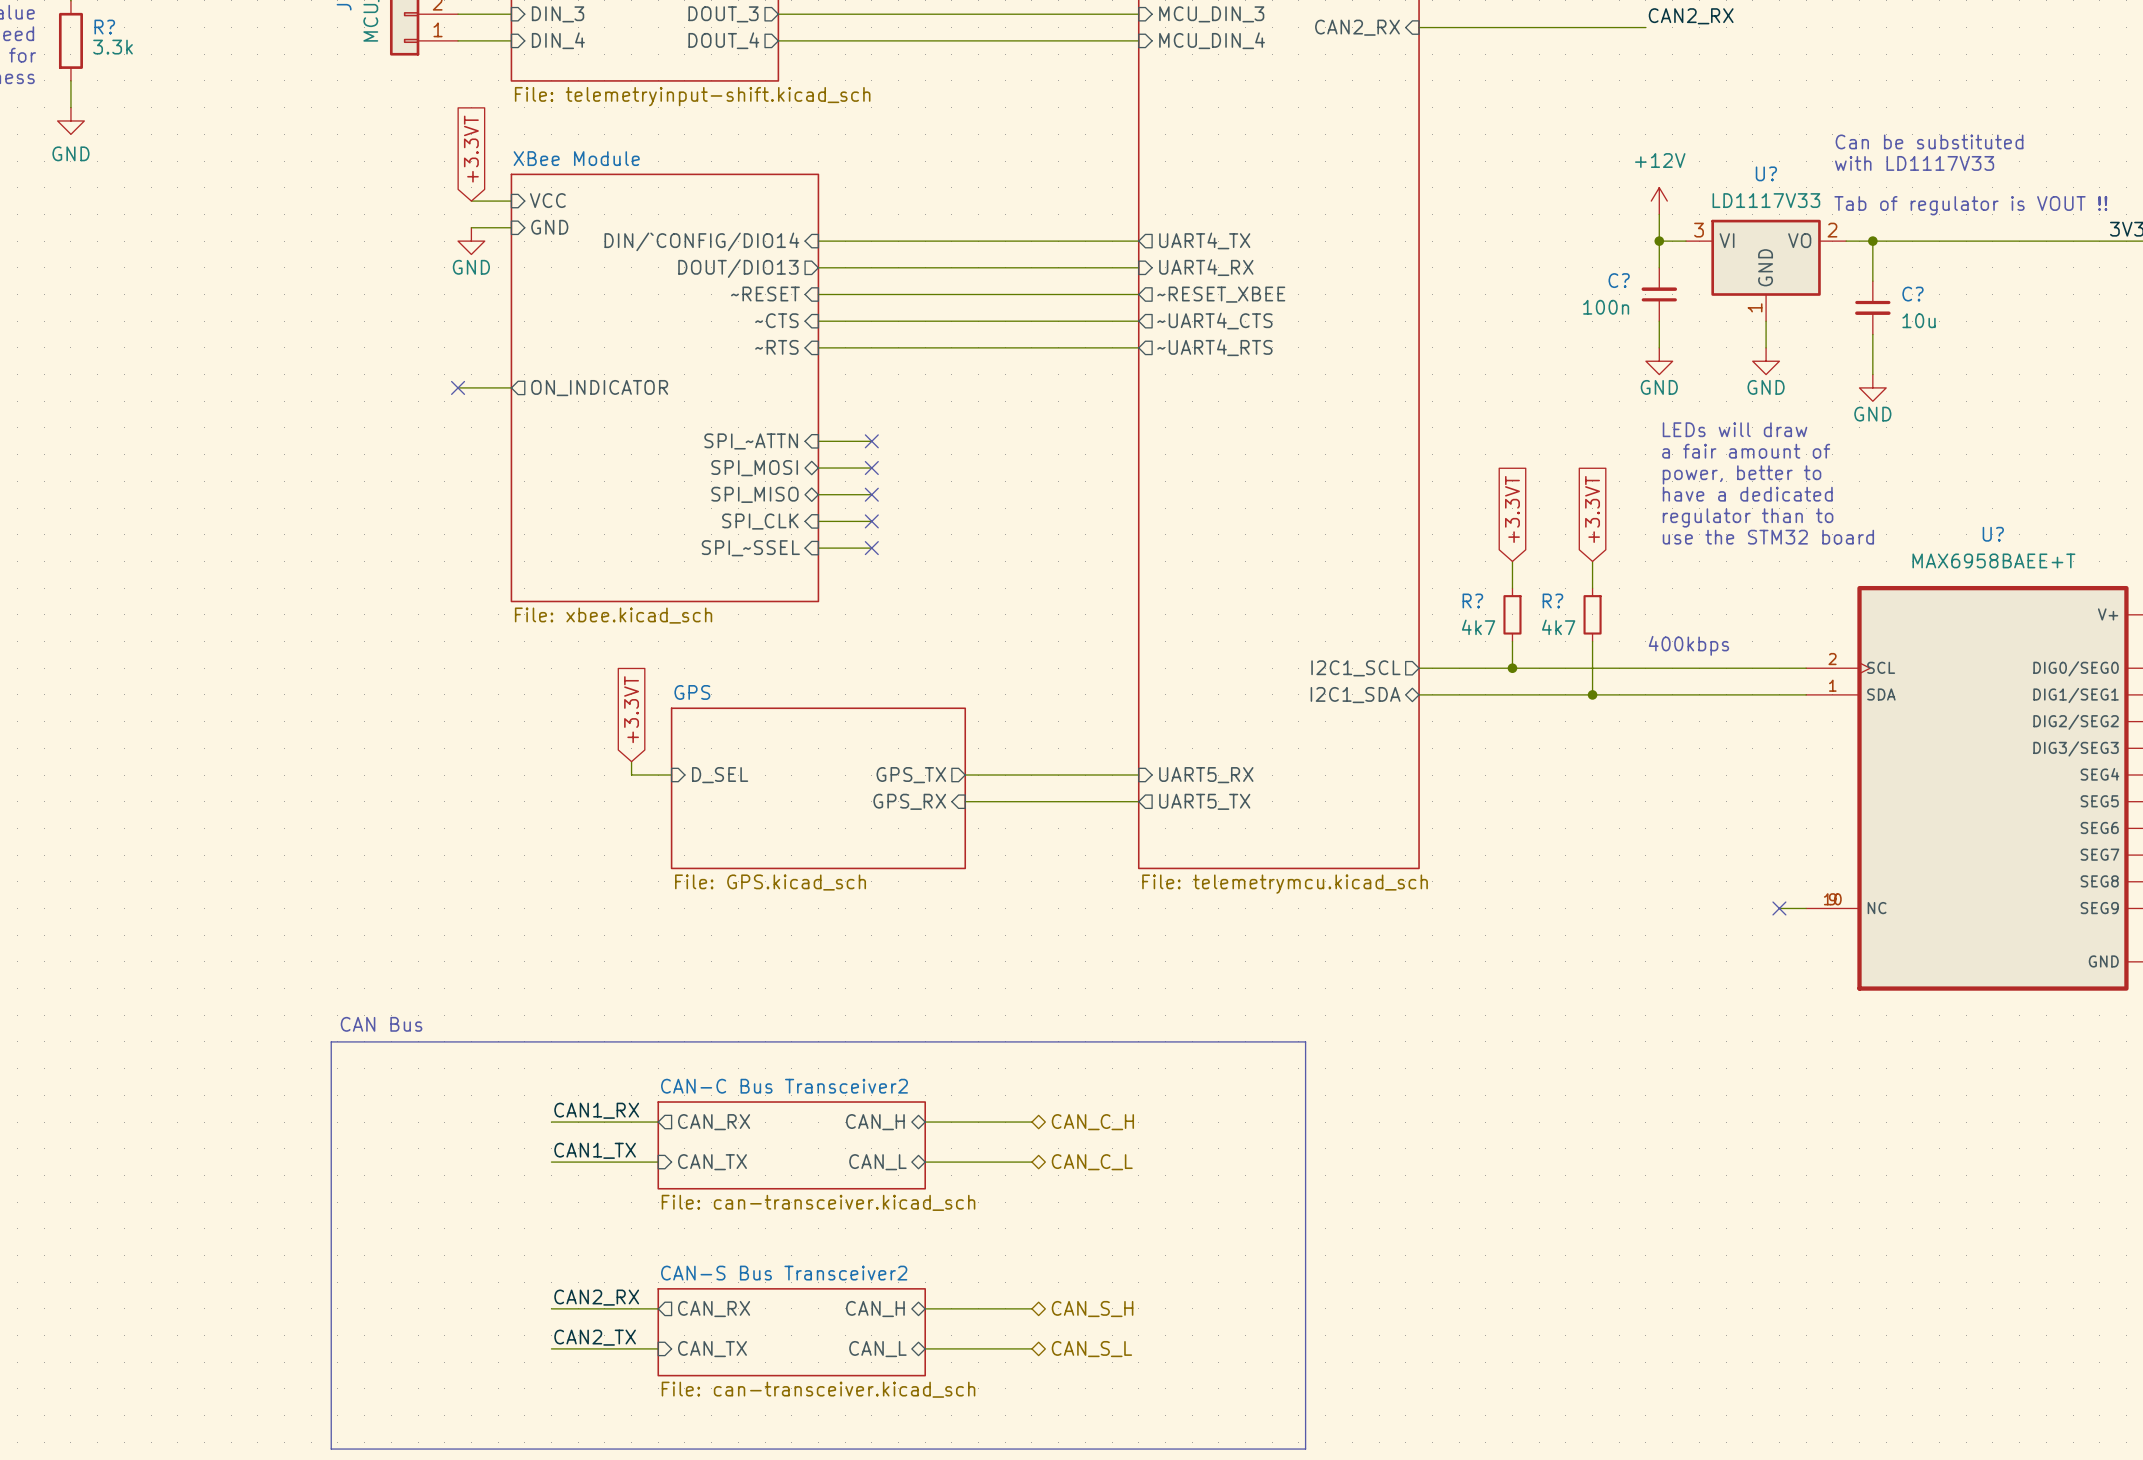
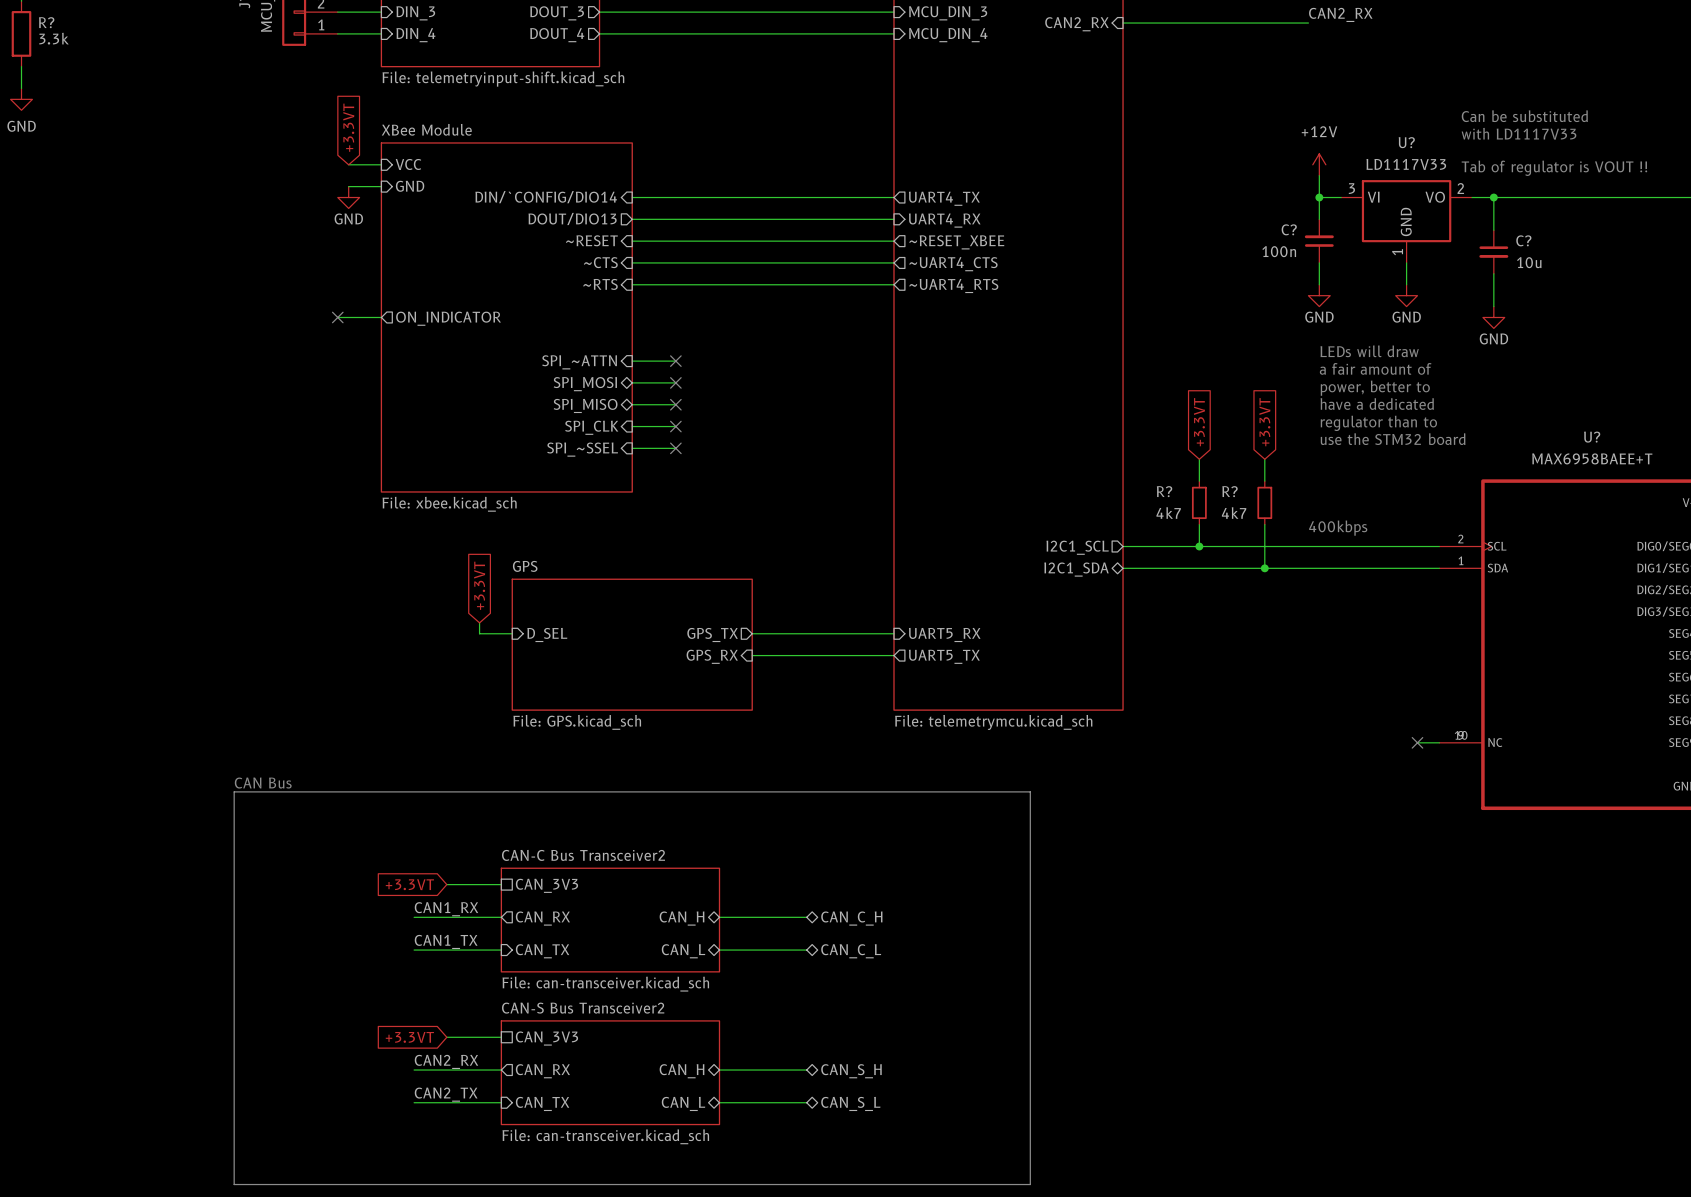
text position: CAN Bus (381, 1024) -> CAN Bus (263, 783)
line: (331, 1041) (1305, 1041) -> (234, 851) (234, 791) (1030, 791) (1030, 851)
global label: none -> +3.3VT (409, 884)
wire: none -> (446, 884) (501, 884)
sheet pin: none -> CAN_3V3 (546, 885)
sheet CAN-C Bus Transceiver2 shape: [657, 1101, 926, 1190] -> [500, 867, 721, 973]
global label: none -> +3.3VT (409, 1037)
wire: none -> (446, 1037) (501, 1037)
sheet pin: none -> CAN_3V3 (546, 1038)
sheet CAN-S Bus Transceiver2 shape: [657, 1288, 926, 1377] -> [500, 1020, 721, 1126]

